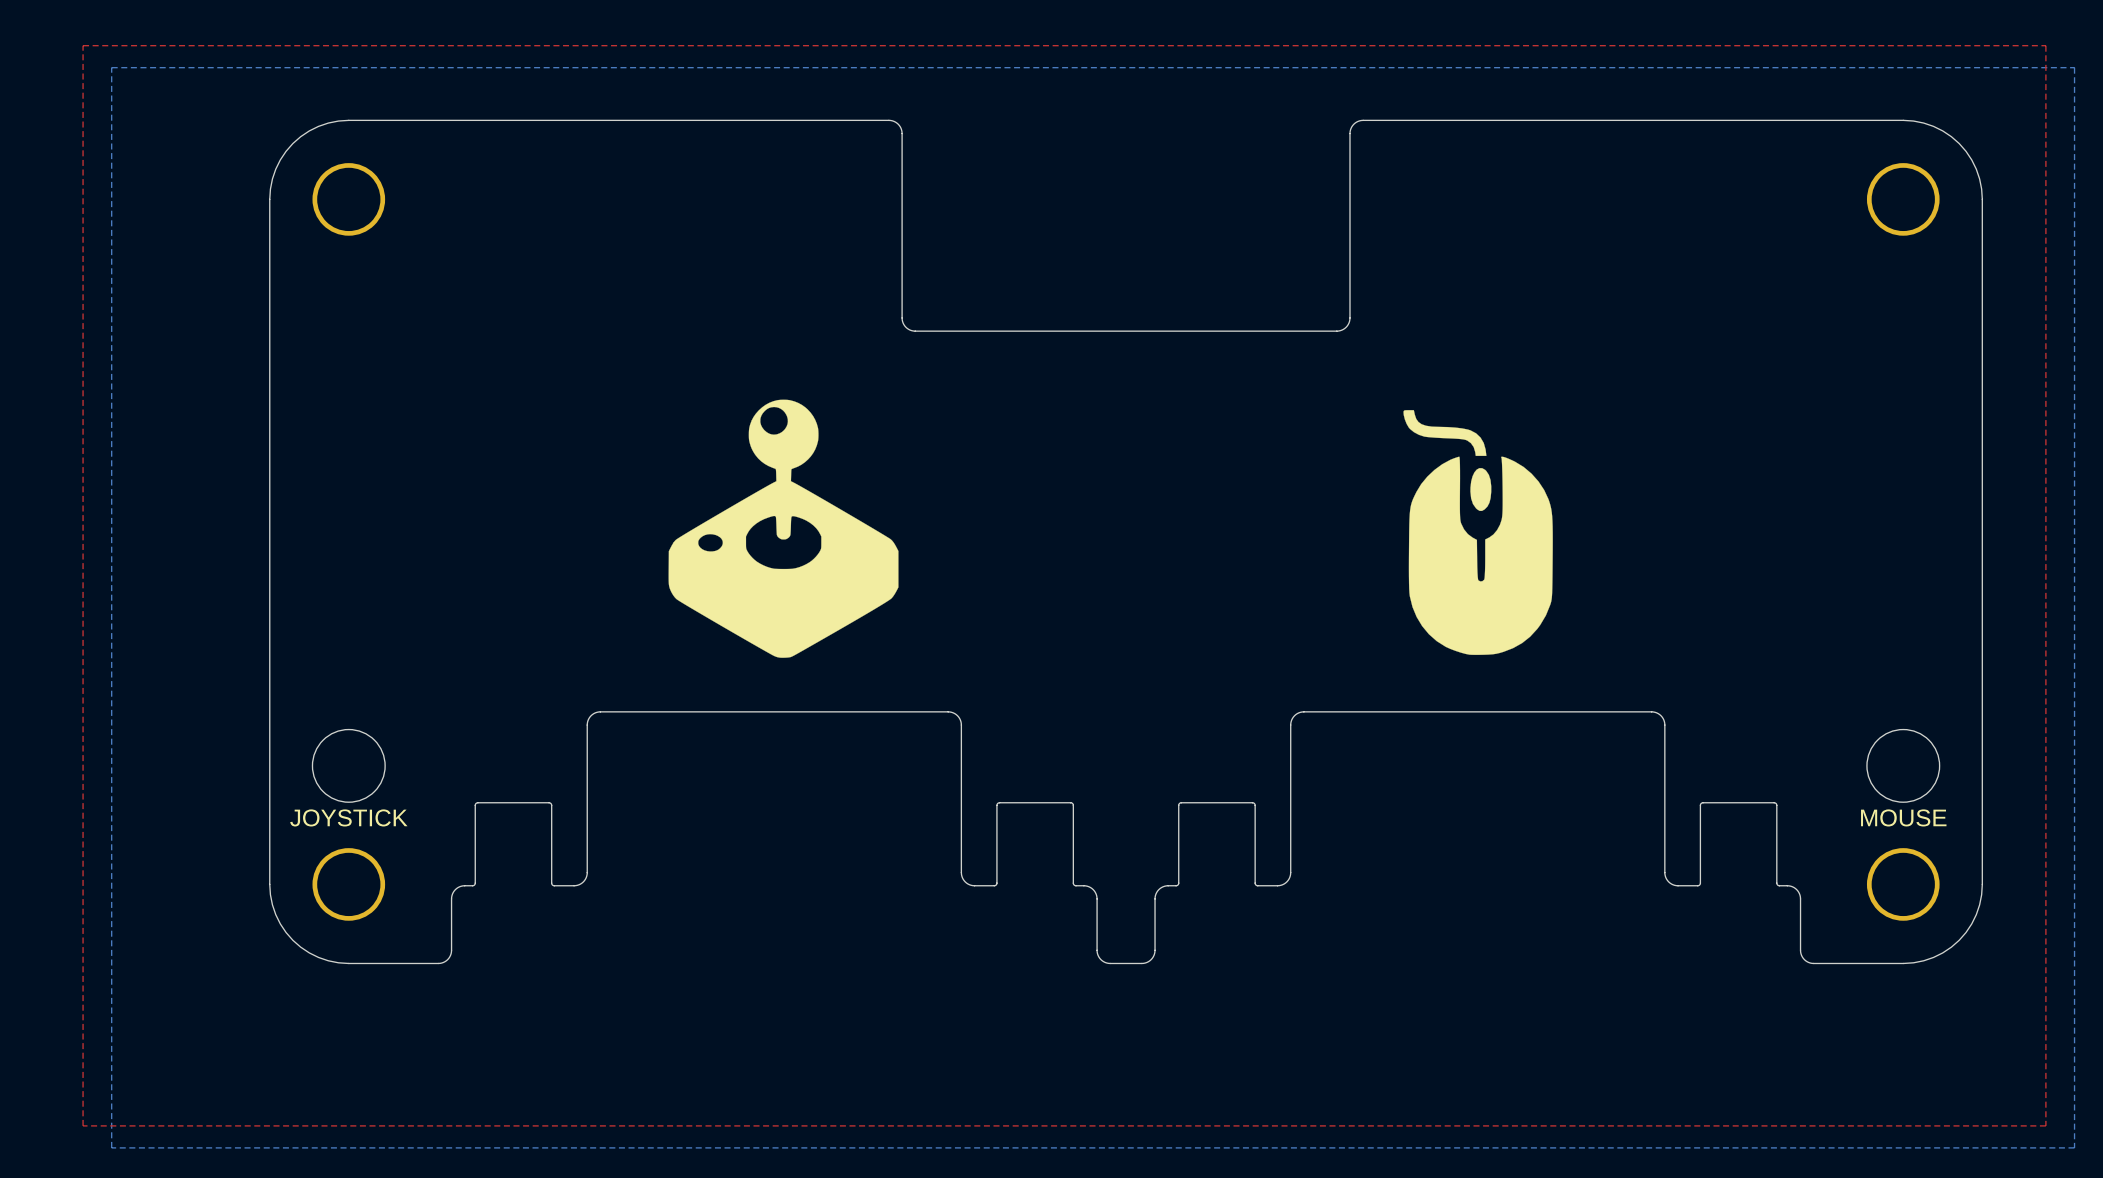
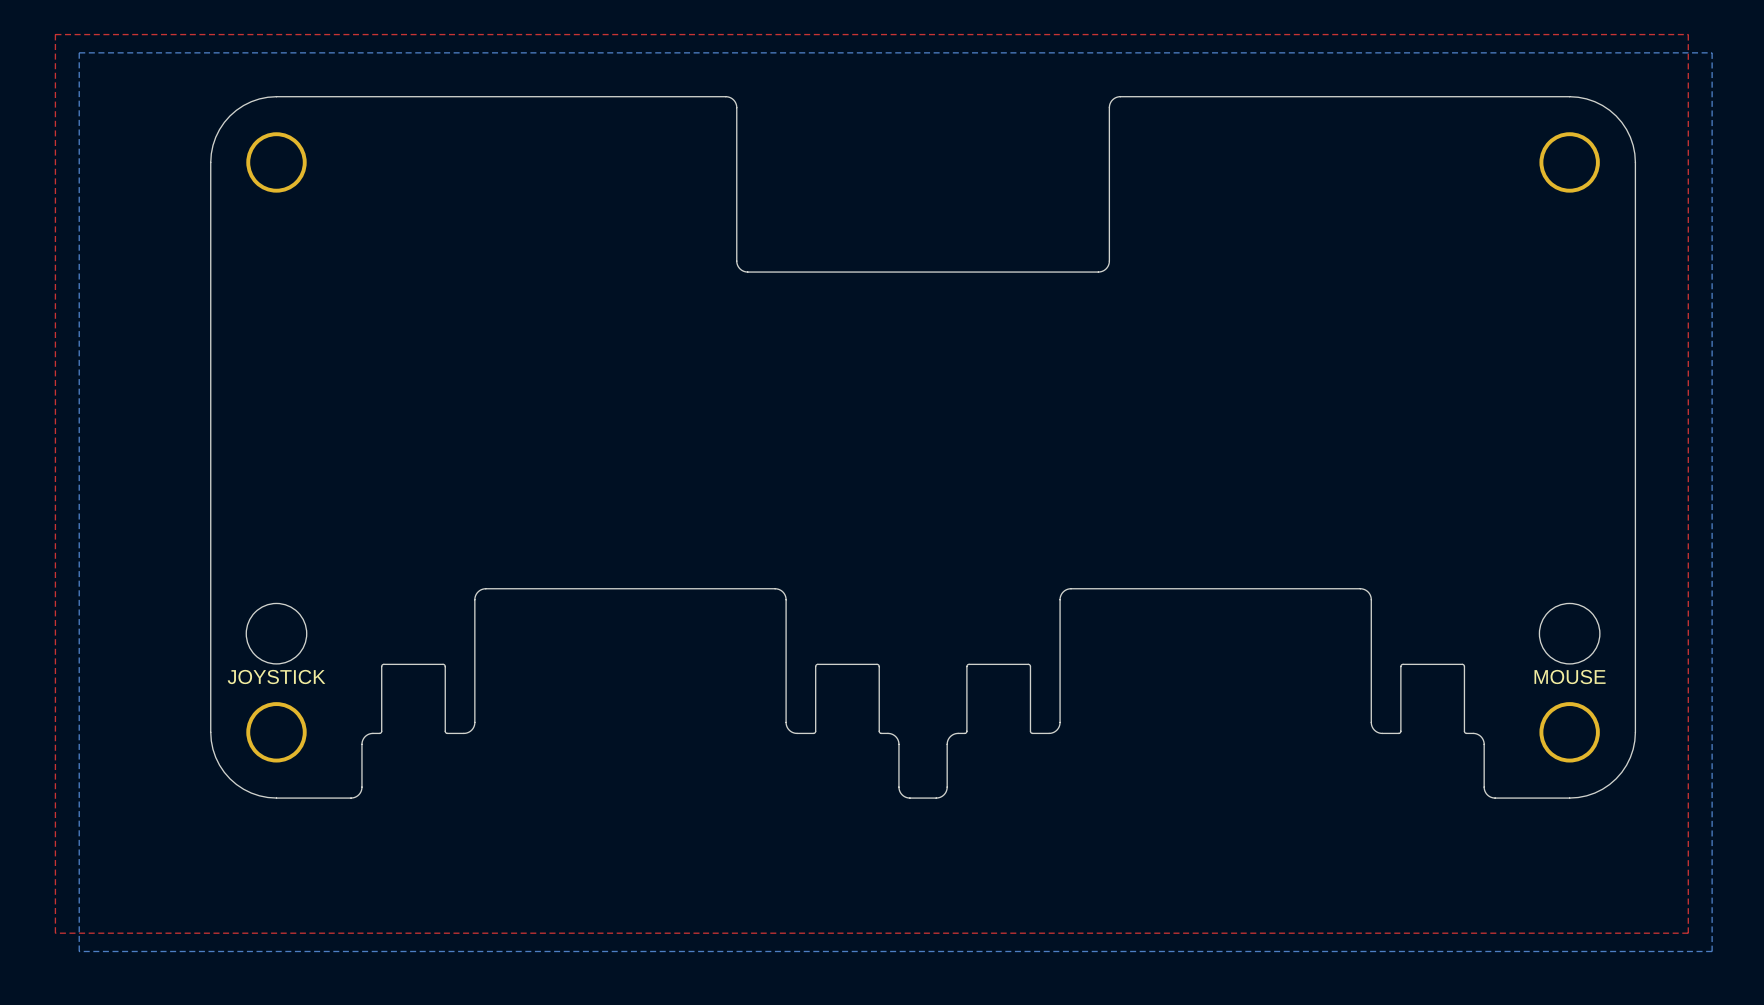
drawing: [668, 399, 899, 658] -> none
drawing: [1403, 410, 1553, 655] -> none

